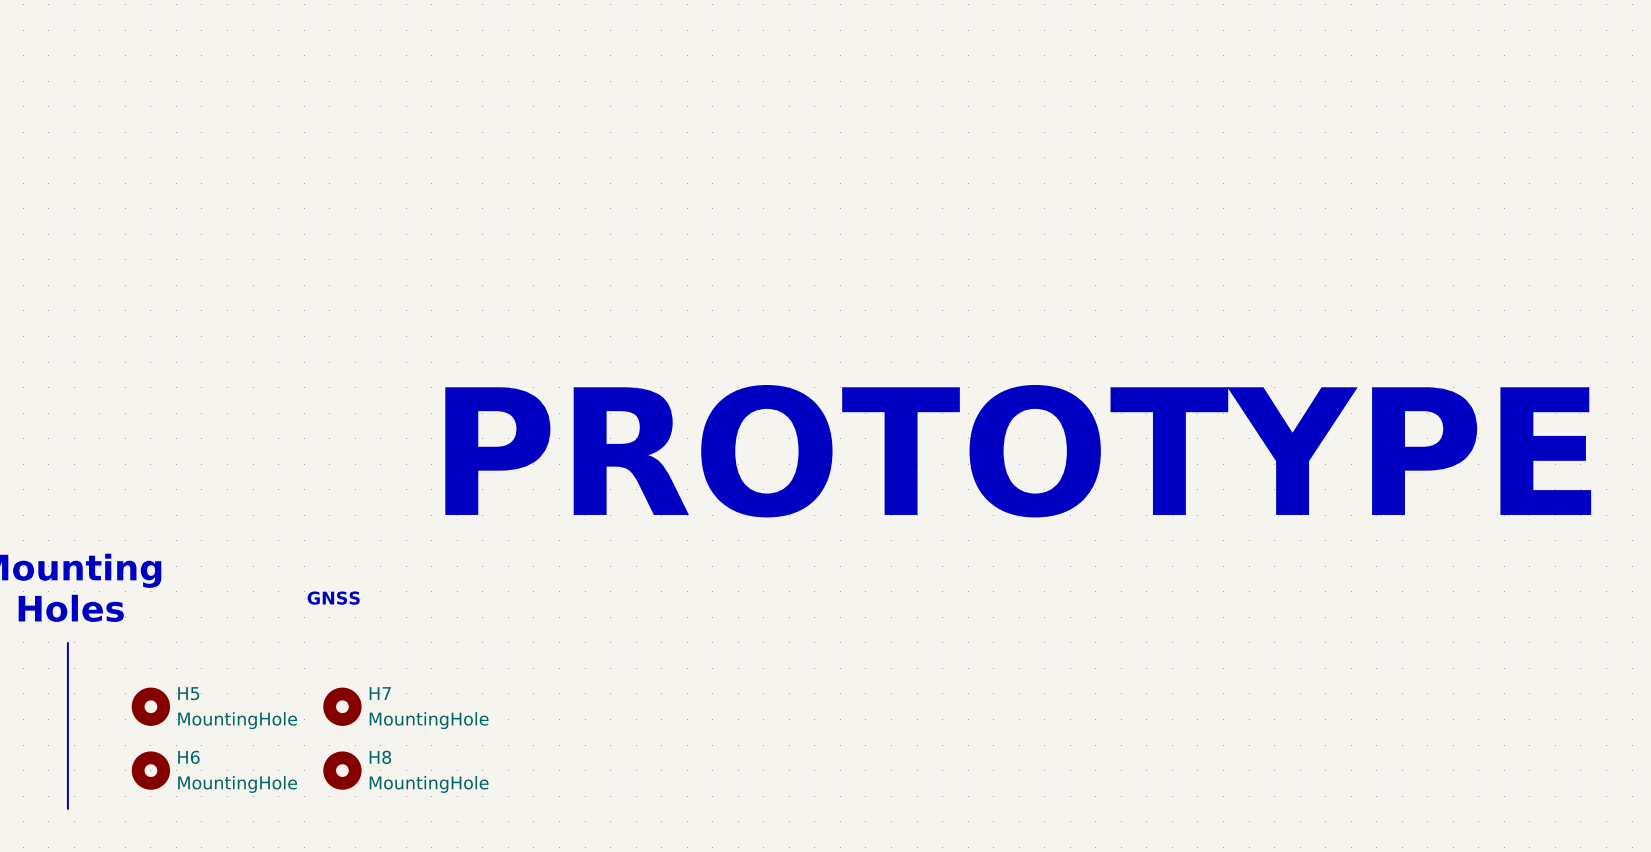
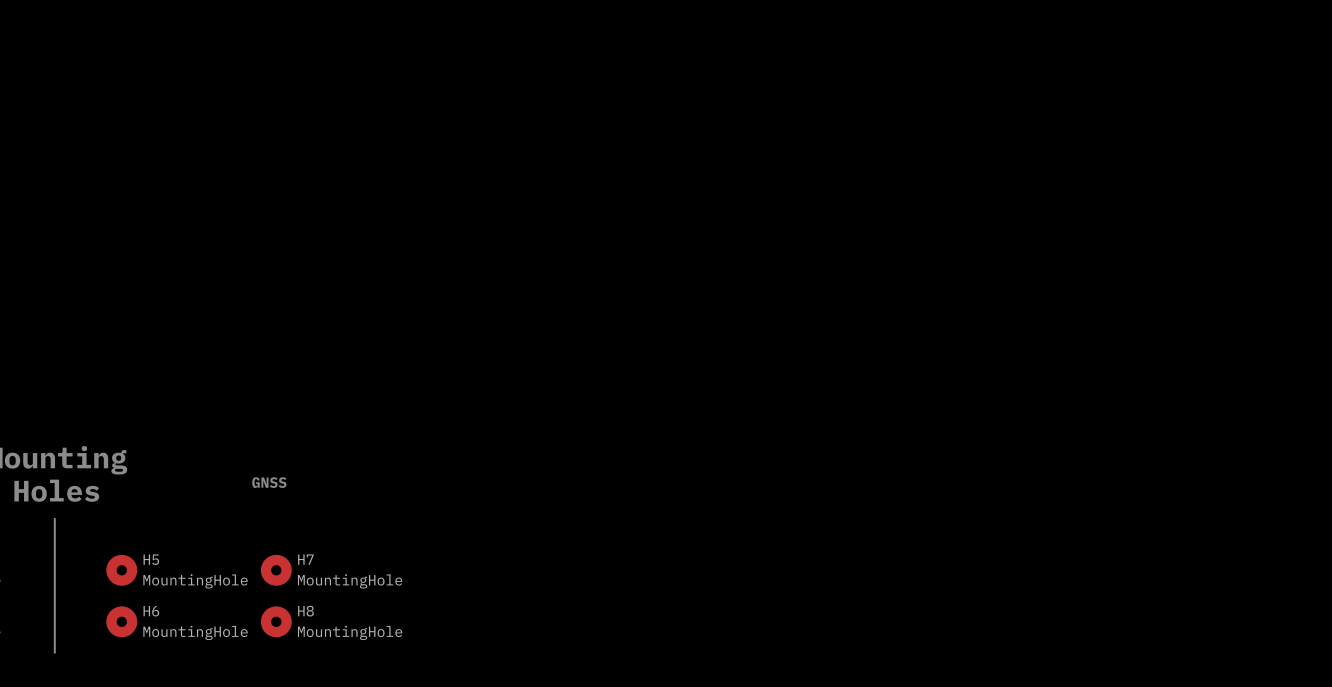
text: PROTOTYPE (1018, 451) -> none

